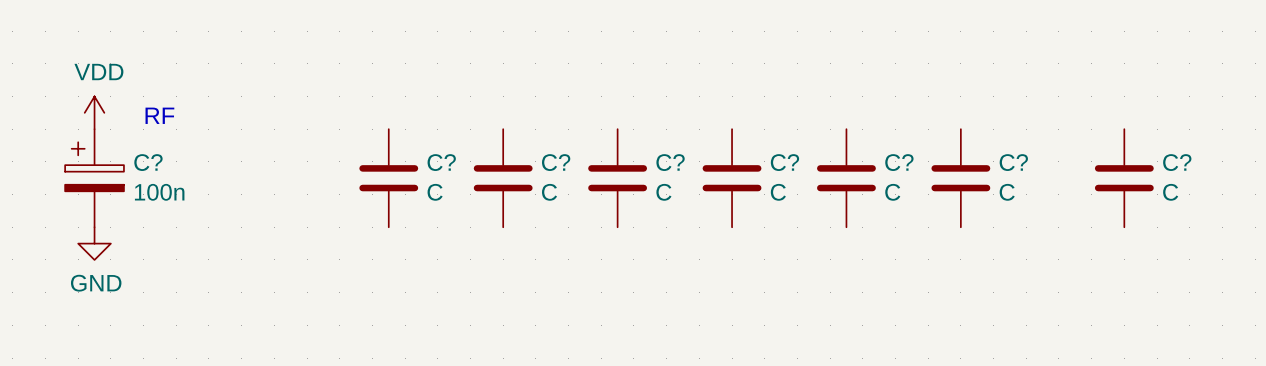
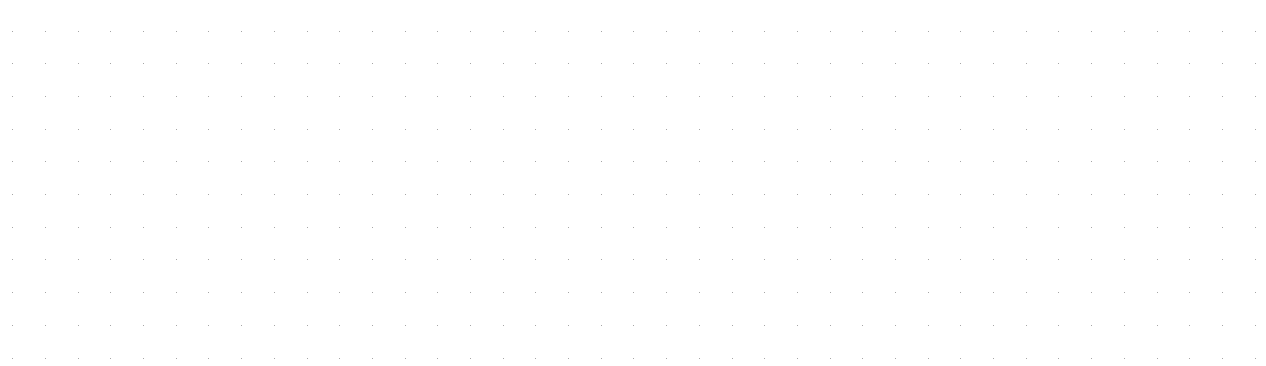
power symbol: VDD (94, 112) -> none
text: RF (159, 115) -> none
C?: 100n (94, 178) -> none
C?: C (388, 178) -> none
C?: C (503, 178) -> none
C?: C (617, 178) -> none
C?: C (732, 178) -> none
C?: C (846, 178) -> none
C?: C (960, 178) -> none
C?: C (1124, 178) -> none
power symbol: GND (94, 243) -> none

